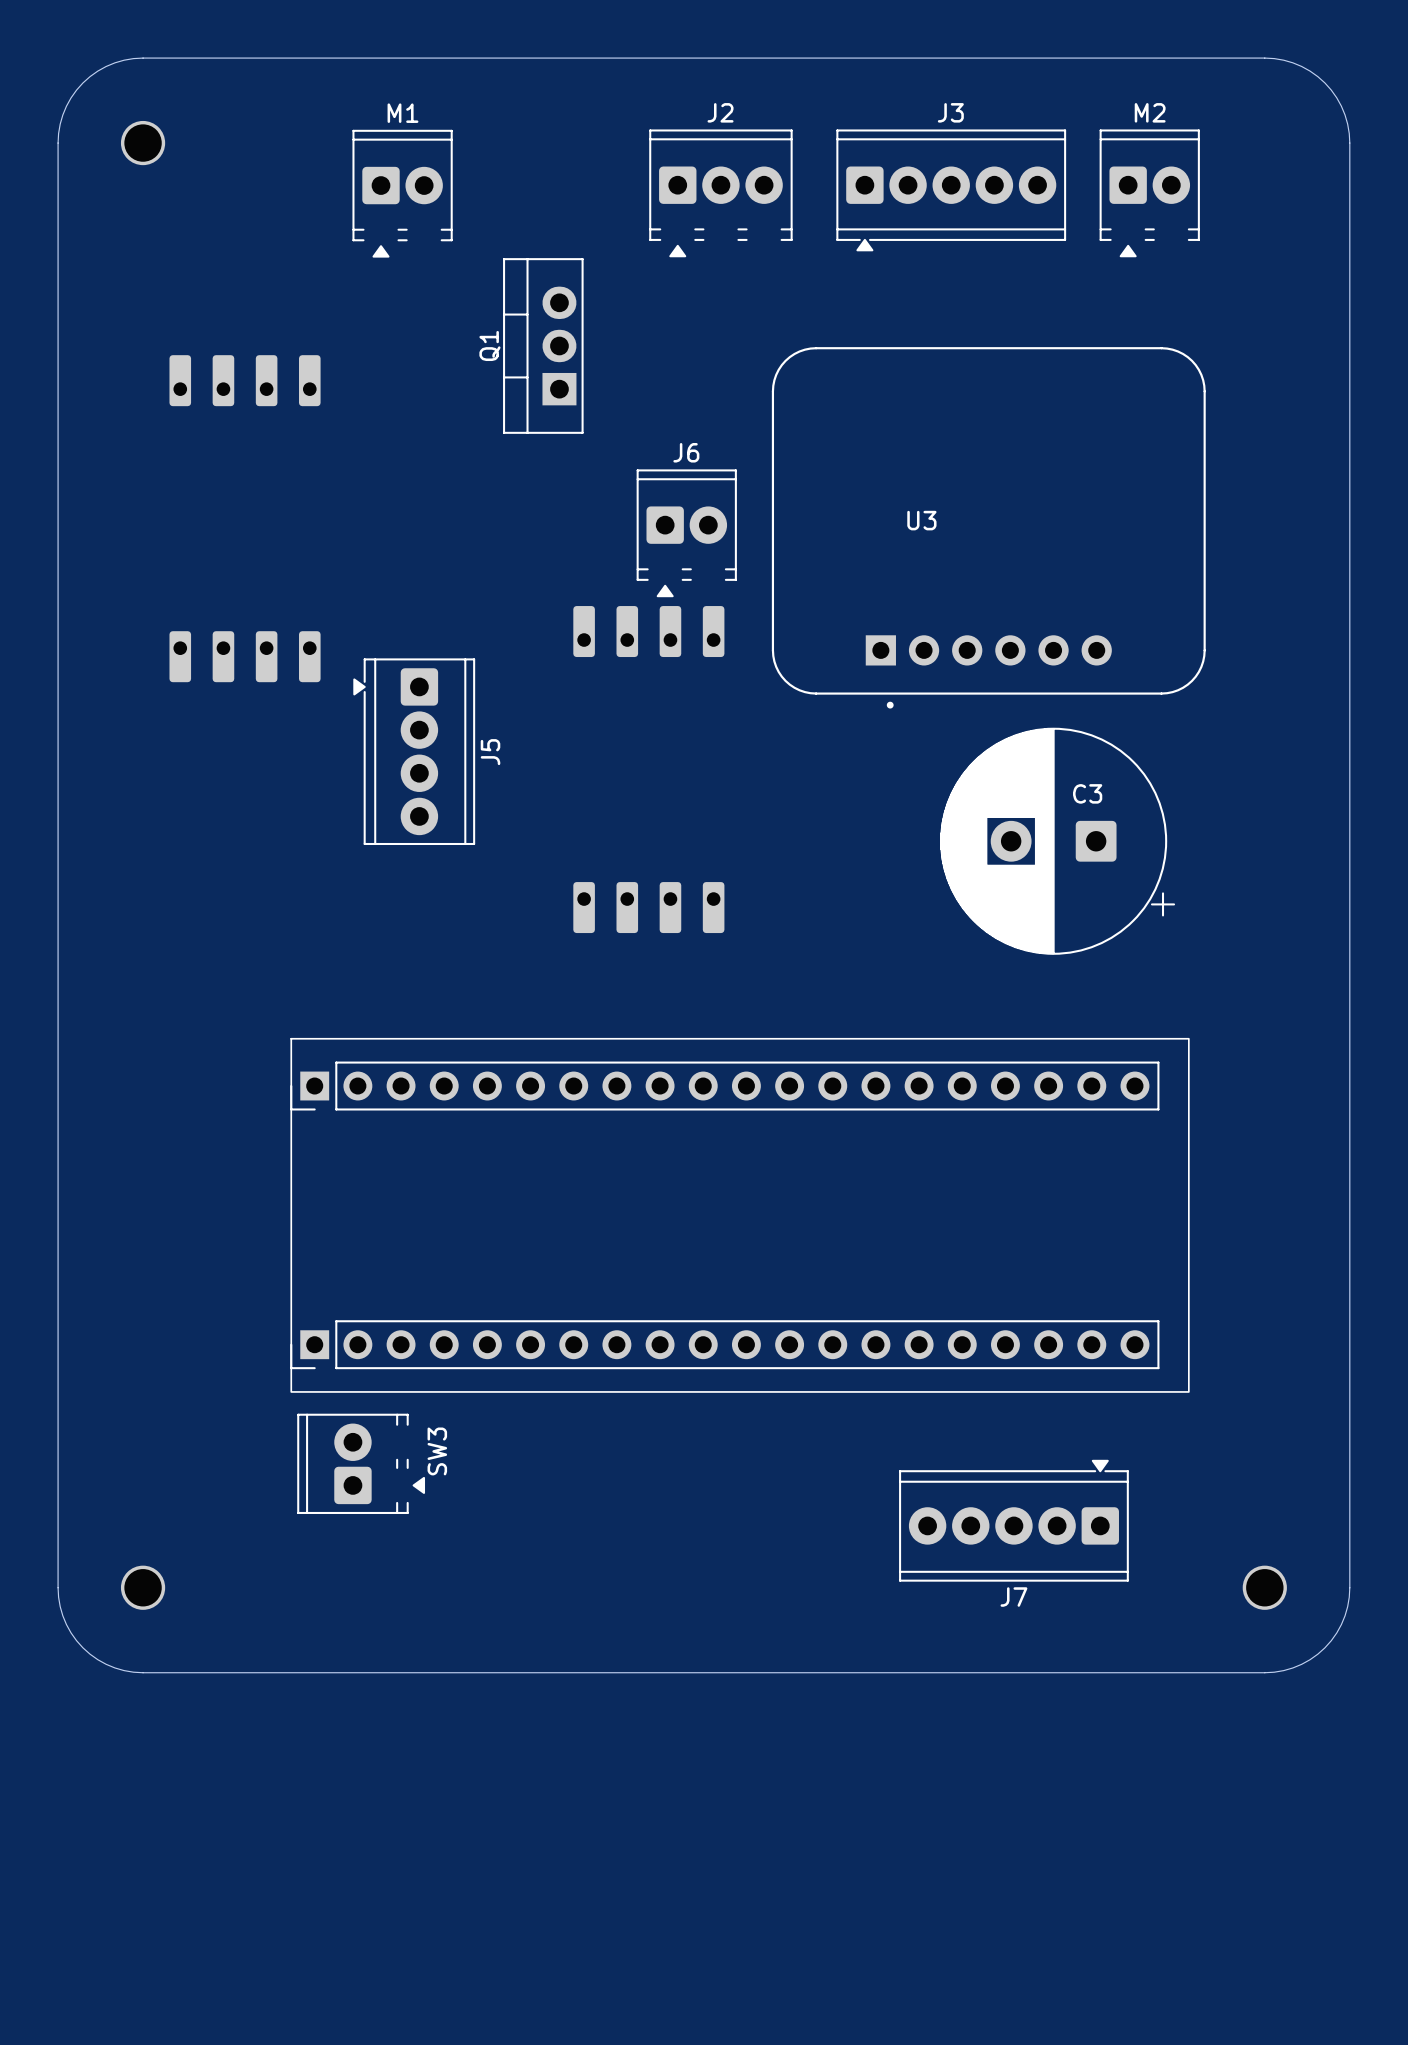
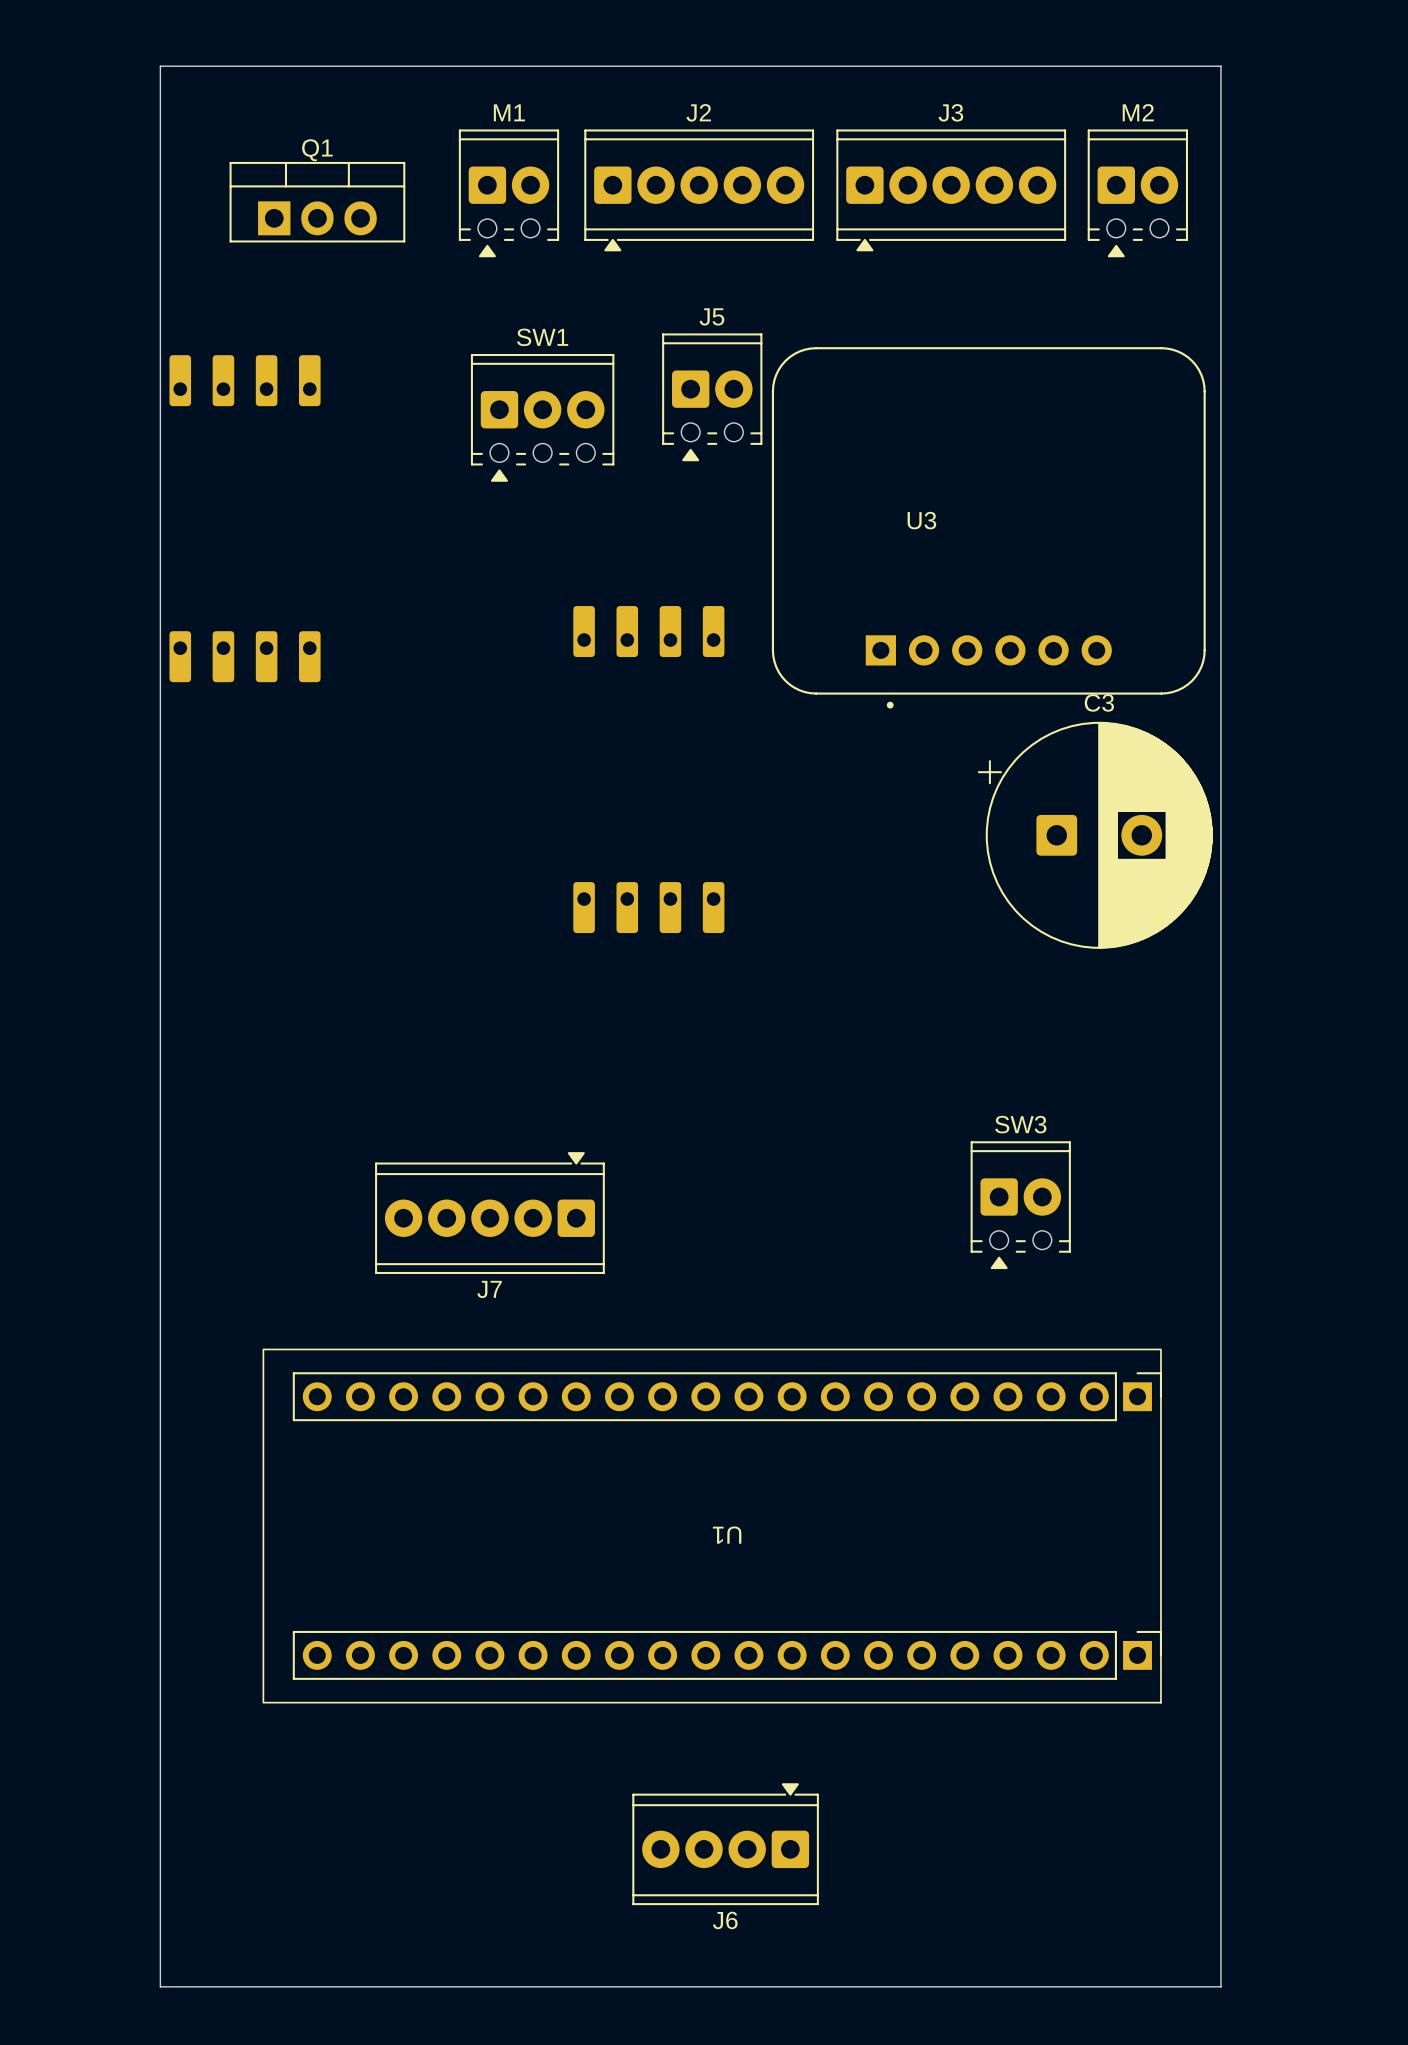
board edge: (143, 58) (1264, 58) (1283, 60) (1301, 66) (1317, 76) (1331, 90) (1345, 114) (1349, 143) (1349, 1587) (1347, 1606) (1341, 1624) (1331, 1640) (1317, 1654) (1292, 1667) (1264, 1672) (143, 1672) (124, 1670) (106, 1664) (90, 1654) (76, 1640) (62, 1615) (58, 1587) (58, 143) (62, 114) (71, 97) (82, 82) (97, 71) (114, 62) (143, 58) -> (160, 66) (160, 1986) (1220, 1986) (1220, 66) (160, 66)
M1 footprint: [352, 129, 453, 258] -> [458, 129, 560, 258]
J2 footprint: [649, 129, 793, 258] -> [584, 129, 815, 252]
M2 footprint: [1099, 129, 1200, 258] -> [1087, 129, 1188, 258]
part: (143, 143) -> none
Q1 rotation: 0° (543, 345) -> 90° clockwise (317, 202)
Q1 position: (543, 345) -> (317, 202)
SW1: none -> (542, 417)
J6 name position: J6 (686, 452) -> J6 (725, 1920)
J6 footprint: [636, 469, 737, 598] -> [632, 1783, 819, 1906]
J5 footprint: [353, 658, 476, 846] -> [662, 333, 763, 462]
J5 name position: J5 (490, 752) -> J5 (711, 316)
C3 name position: C3 (1087, 793) -> C3 (1099, 702)
C3 rotation: 0° (1057, 841) -> 180° (1095, 835)
part: (739, 1215) -> none
SW3 footprint: [297, 1413, 426, 1514] -> [970, 1141, 1071, 1270]
SW3 name position: SW3 (437, 1451) -> SW3 (1020, 1124)
J7 position: (1013, 1520) -> (489, 1213)
U1: none -> (712, 1526)
part: (143, 1587) -> none
part: (1264, 1587) -> none

